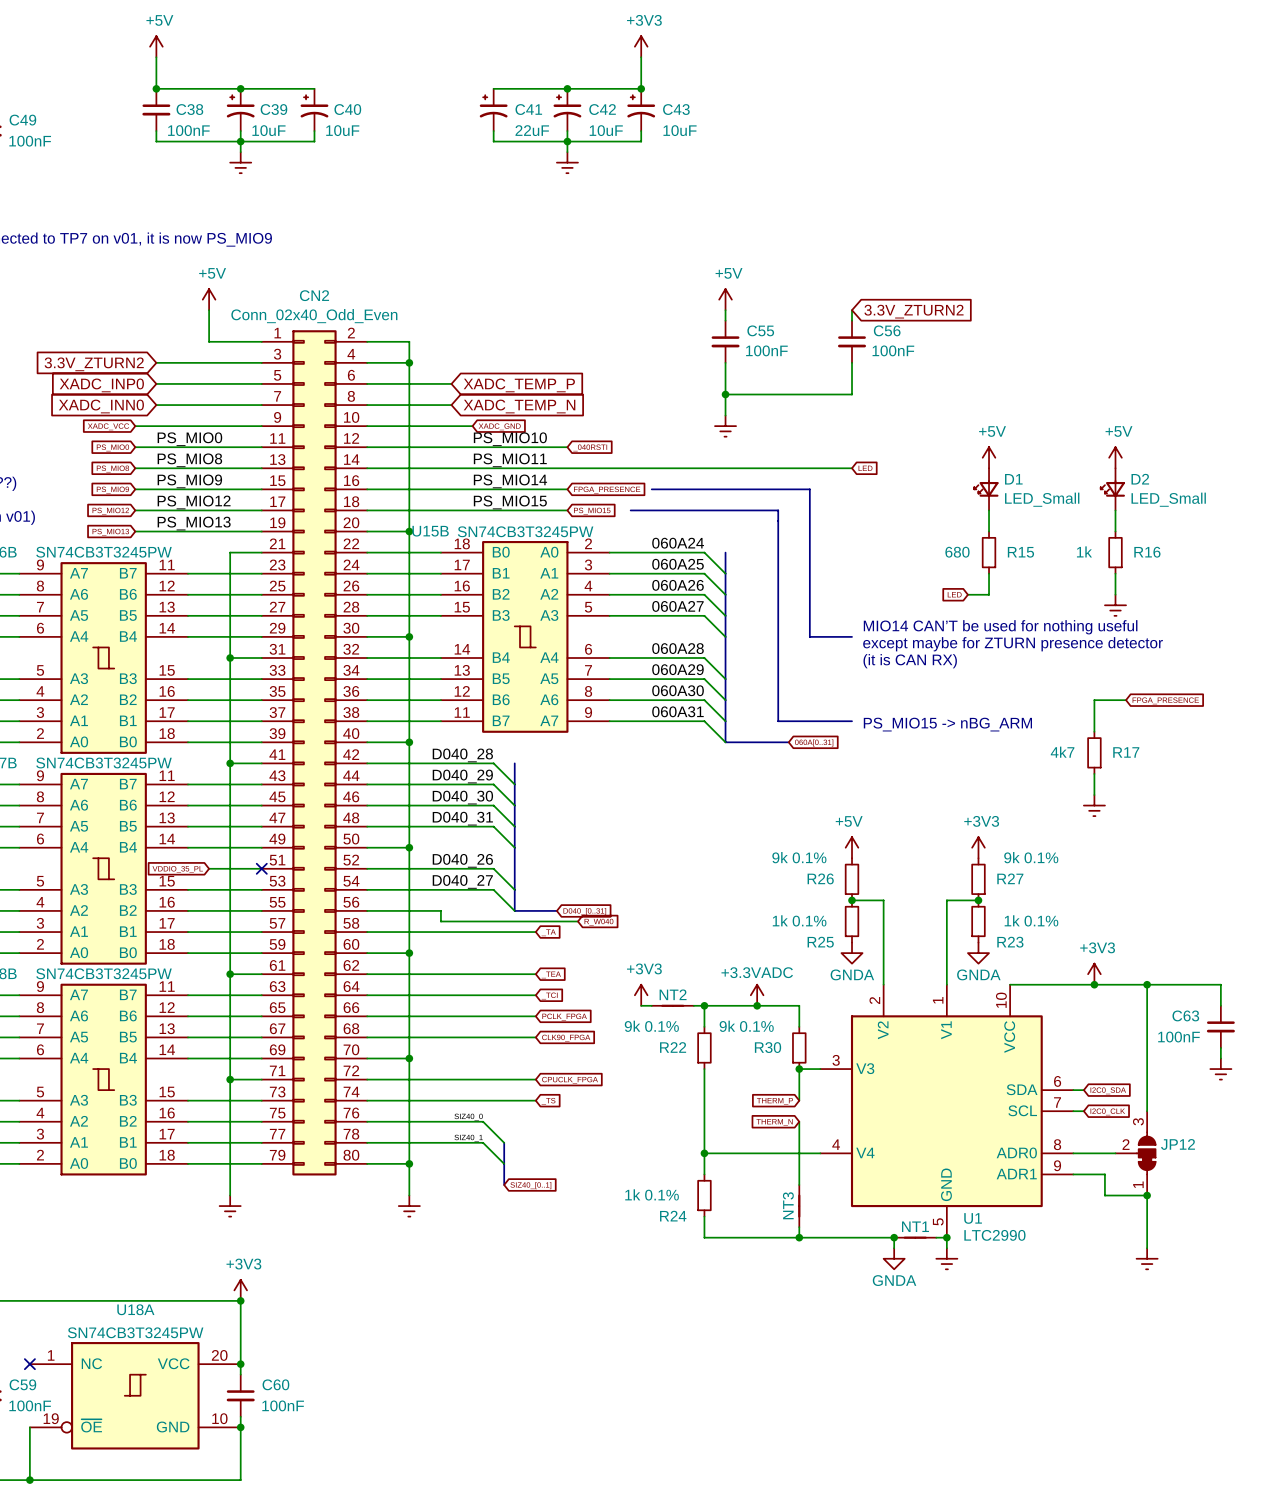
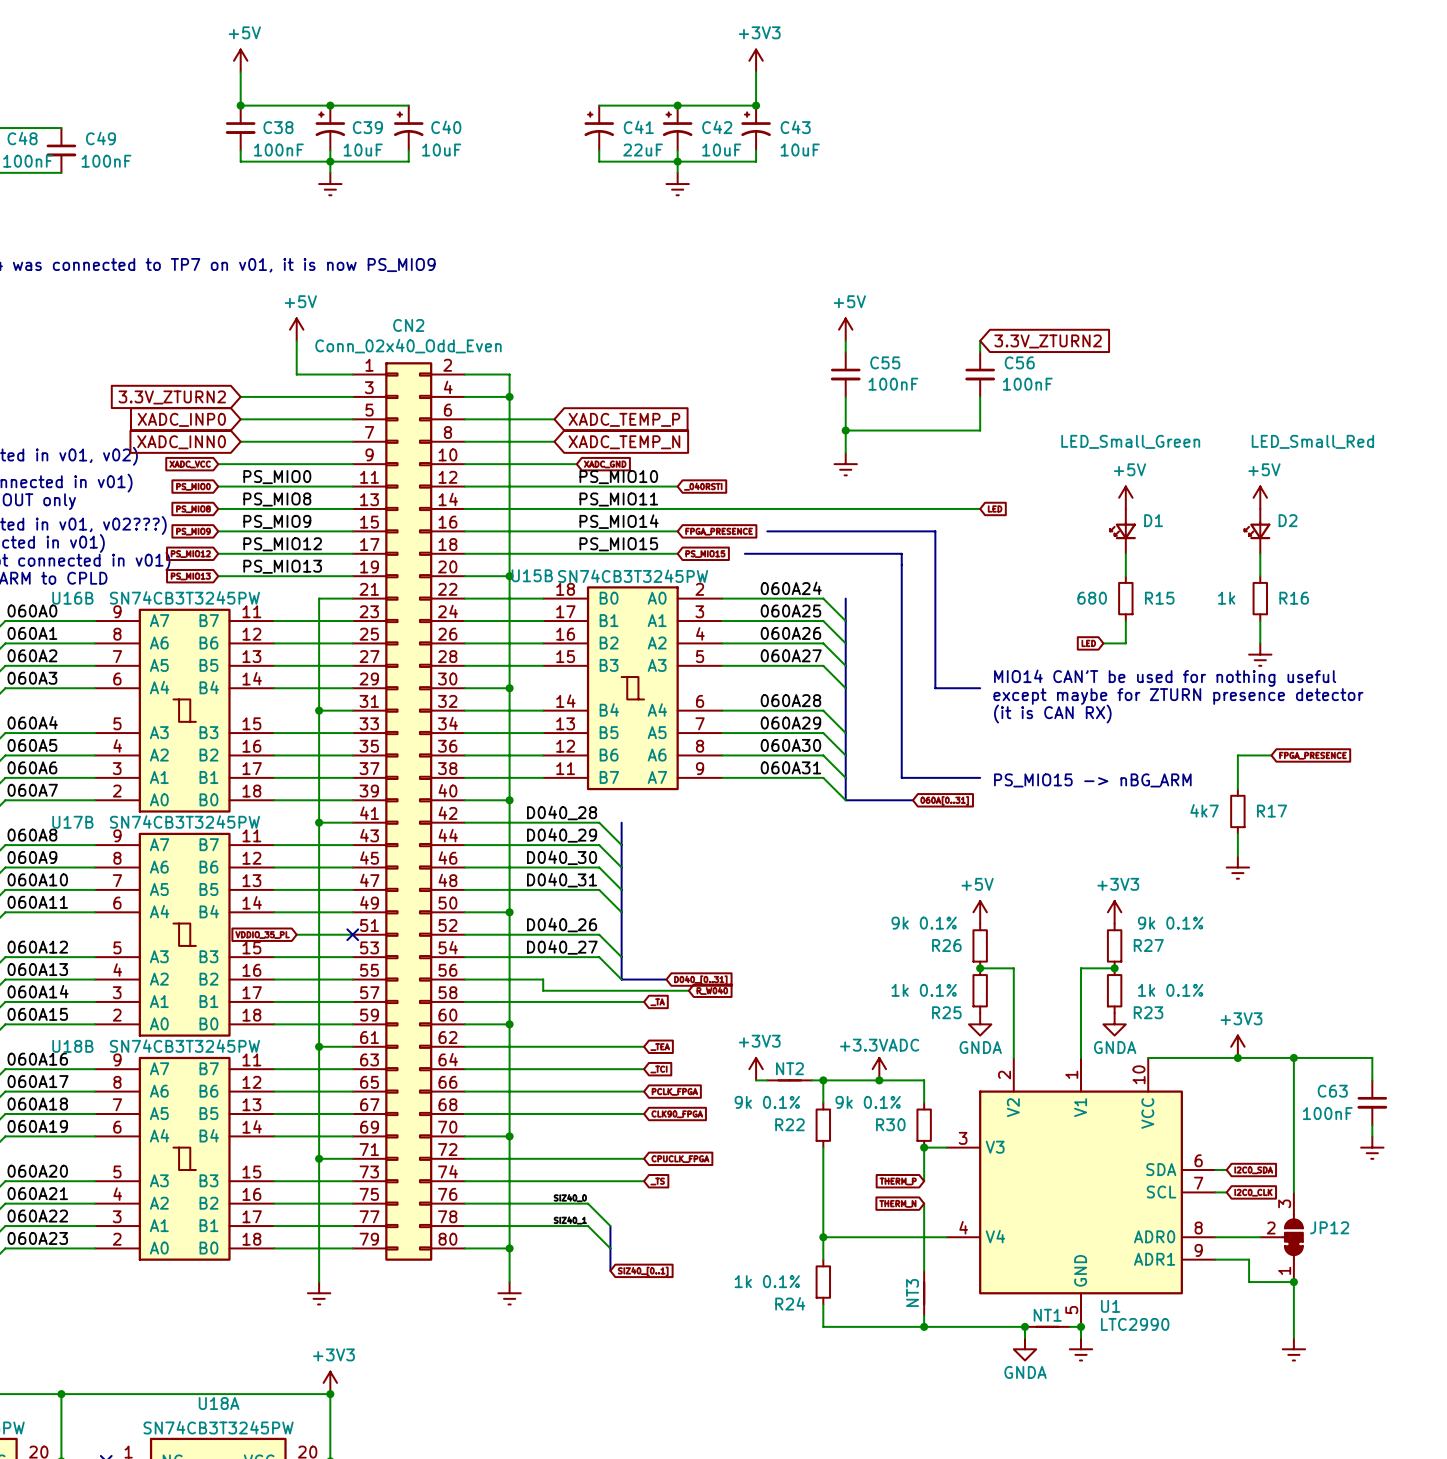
D1 value: LED_Small (1042, 499) -> LED_Small_Green (1130, 441)
D2 value: LED_Small (1168, 499) -> LED_Small_Red (1312, 441)

